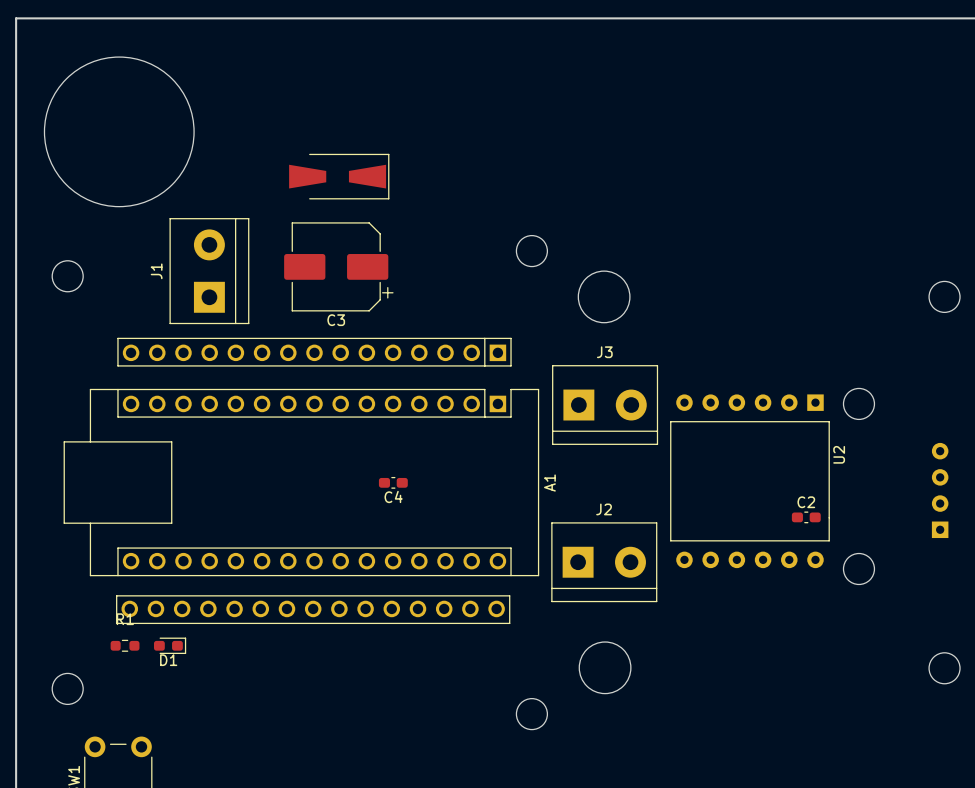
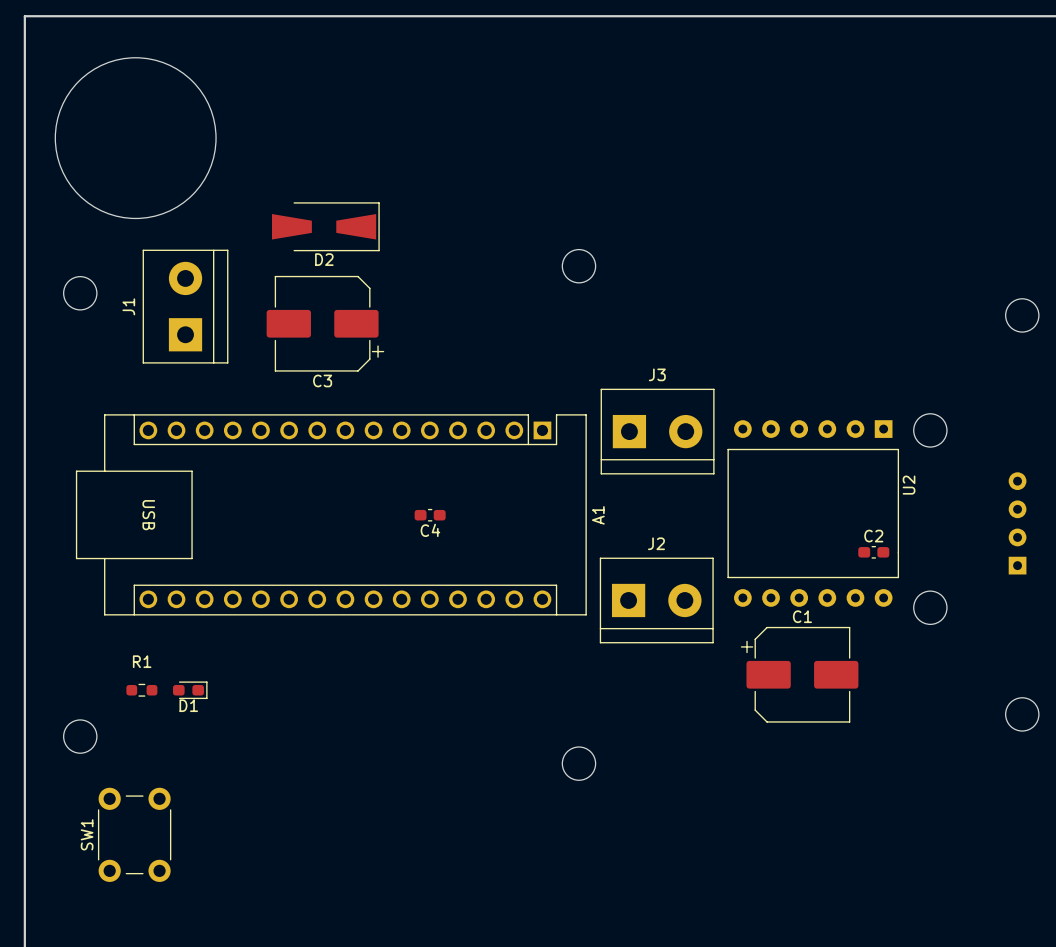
part: (339, 176) -> none
D2: none -> (325, 226)
C3 position: (338, 266) -> (325, 323)
round board edge: [578, 270, 631, 323] -> none
J1 position: (209, 271) -> (185, 306)
A1 footprint: [63, 337, 540, 625] -> [75, 414, 587, 616]
C1: none -> (799, 674)
round board edge: [579, 641, 632, 694] -> none

